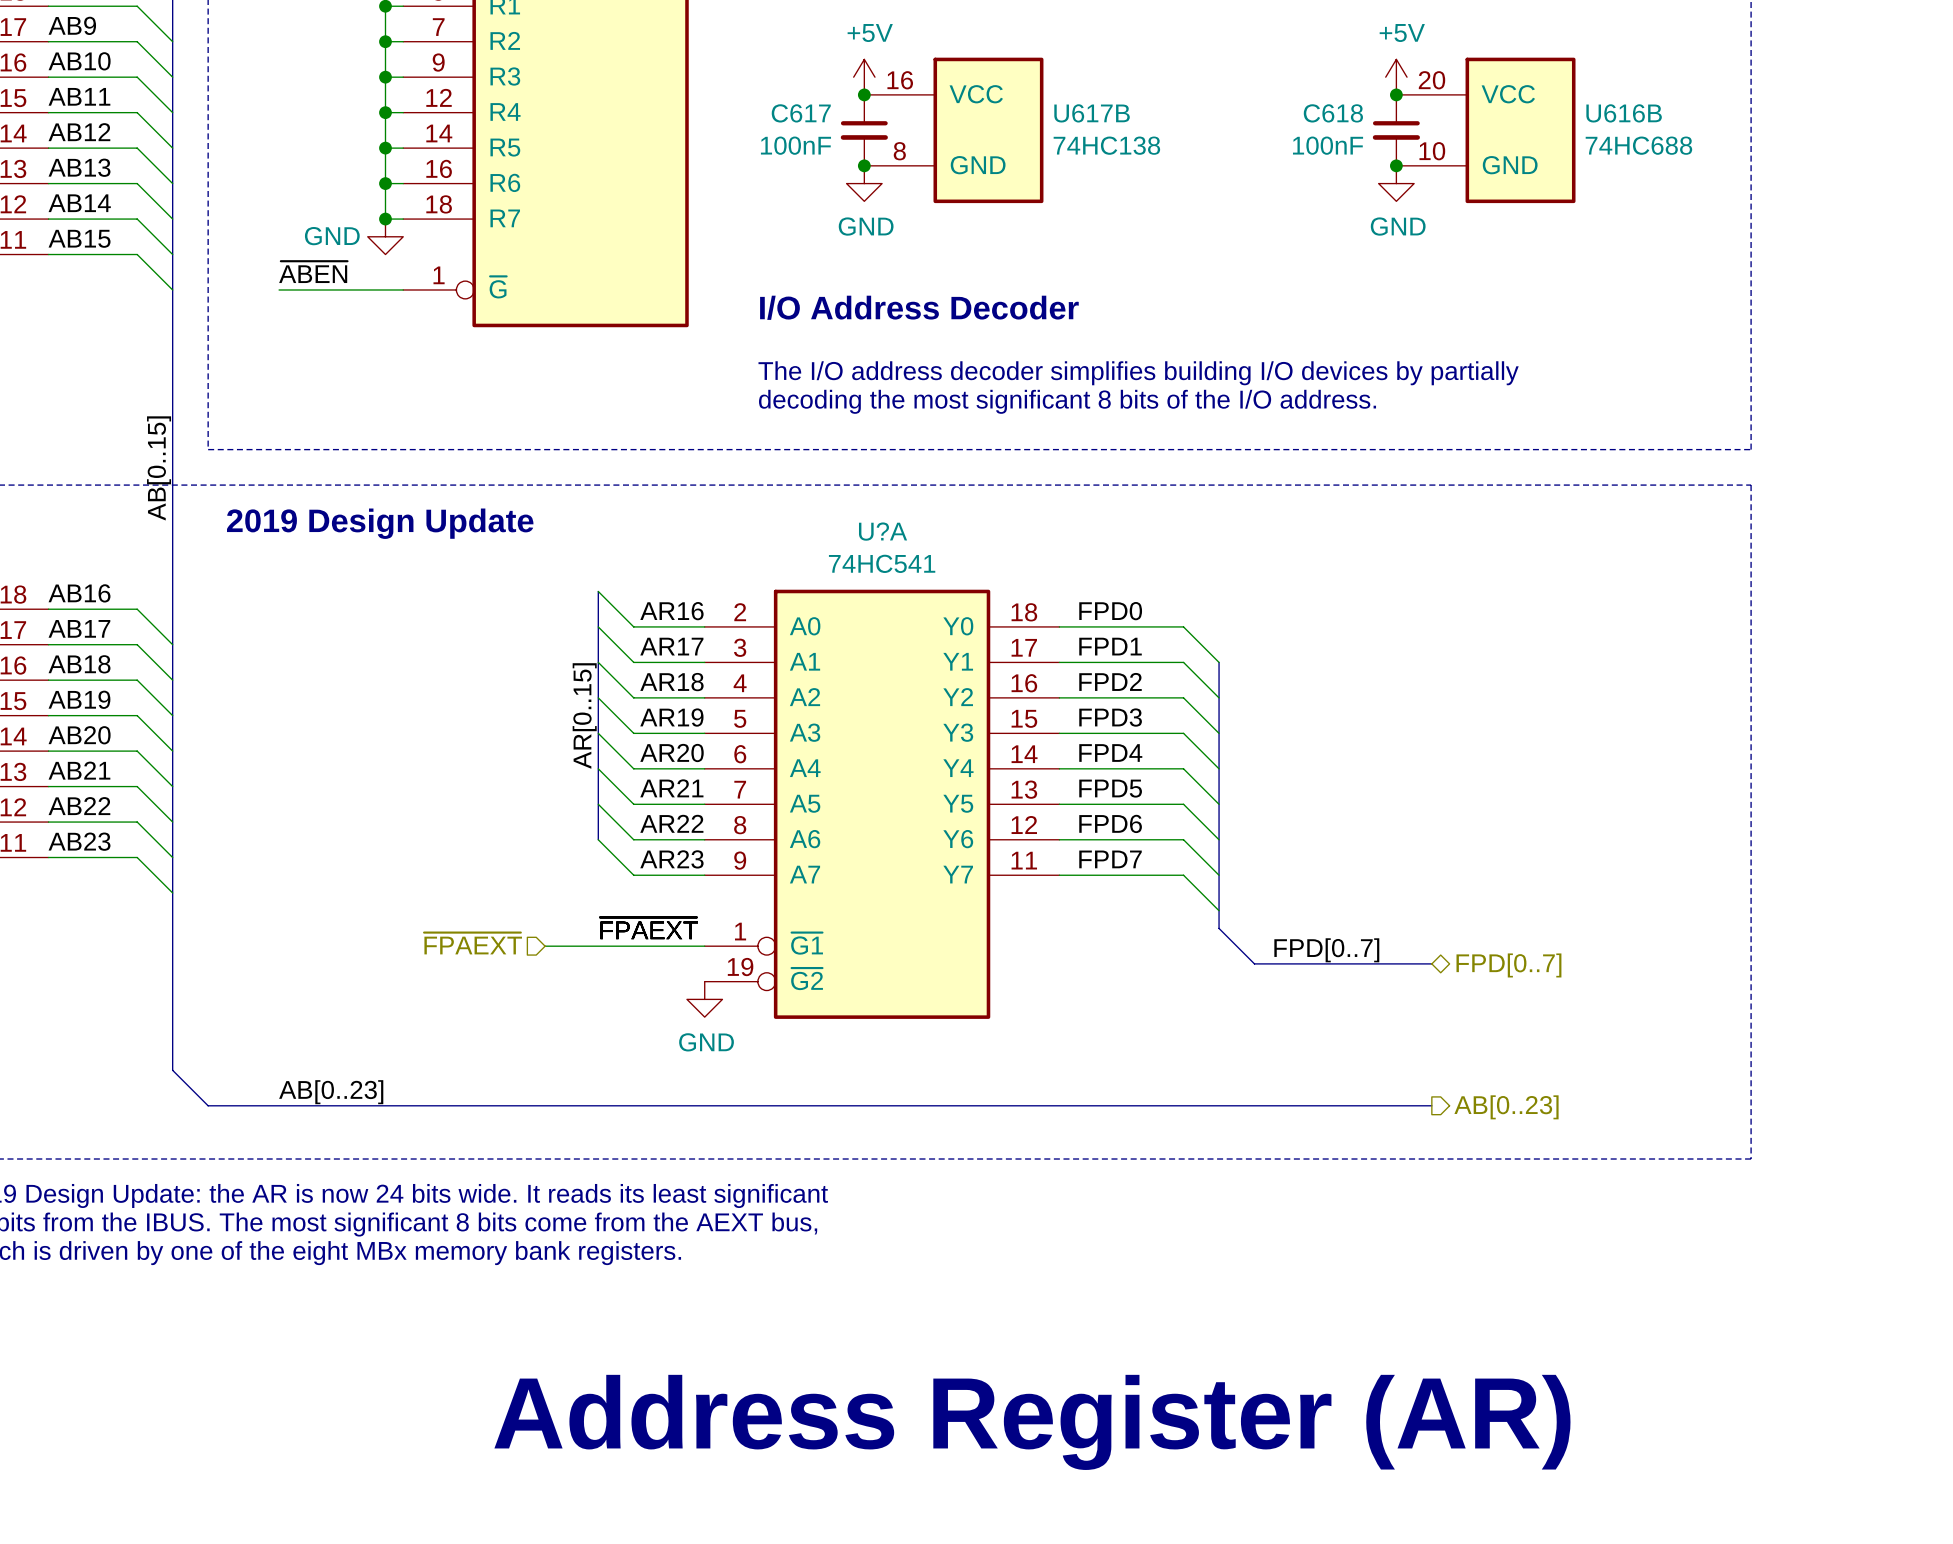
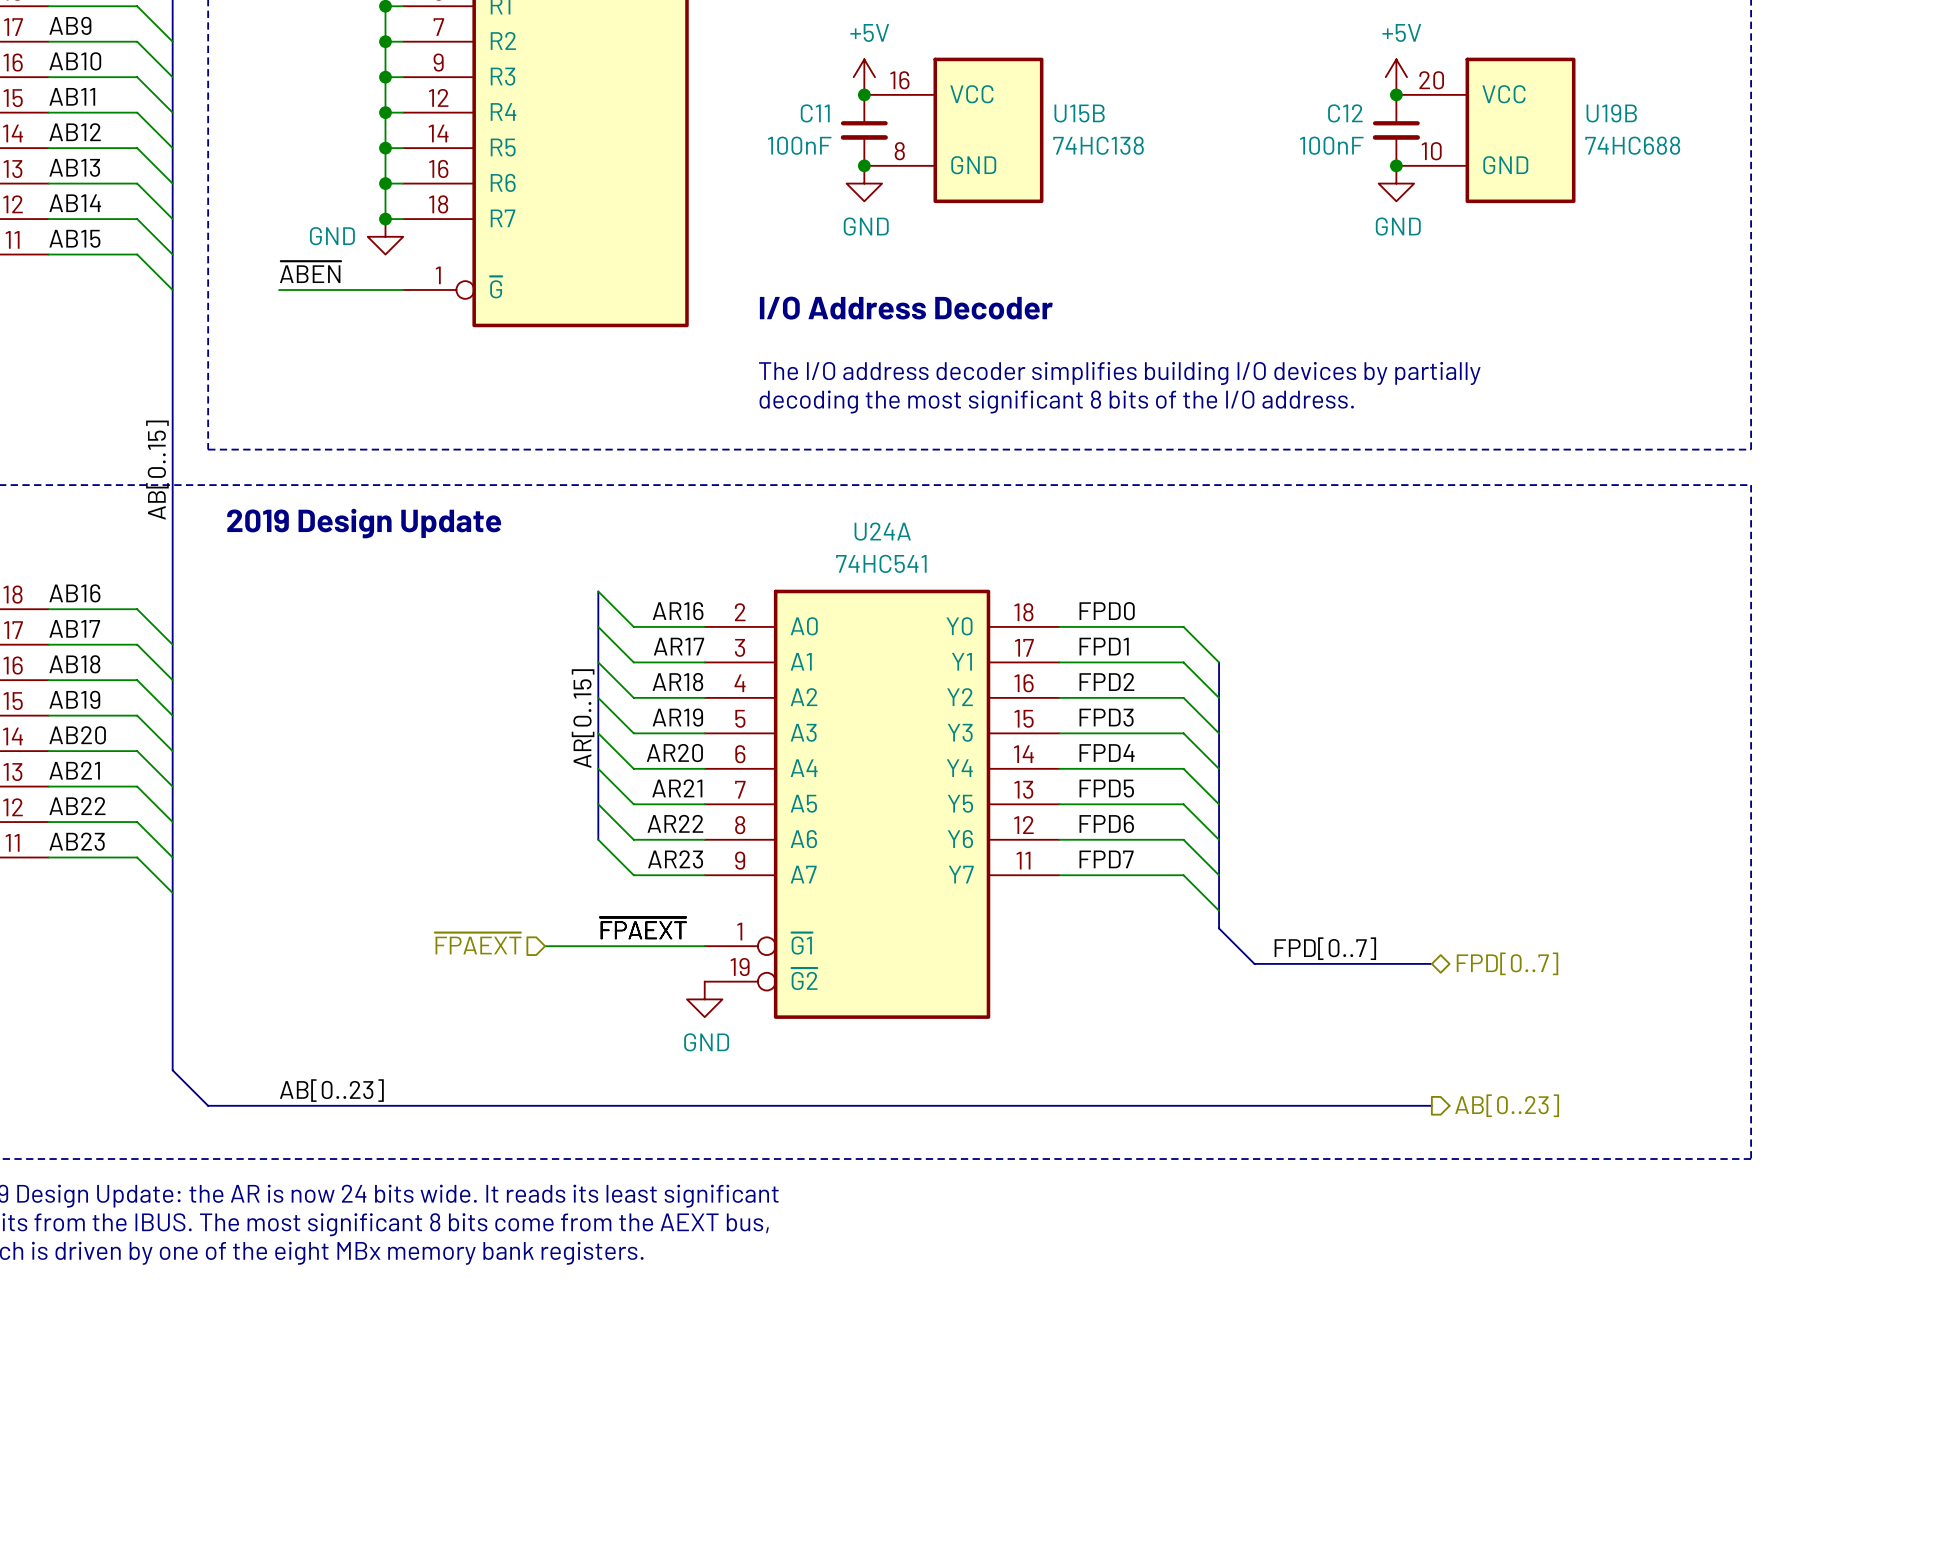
C617 name: C617 (801, 113) -> C11 (815, 113)
U617B name: U617B (1092, 113) -> U15B (1079, 113)
C618 name: C618 (1333, 113) -> C12 (1345, 113)
U616B name: U616B (1624, 113) -> U19B (1611, 113)
U?A name: U?A (883, 531) -> U24A (882, 531)
text: Address Register (AR) (1032, 1422) -> none

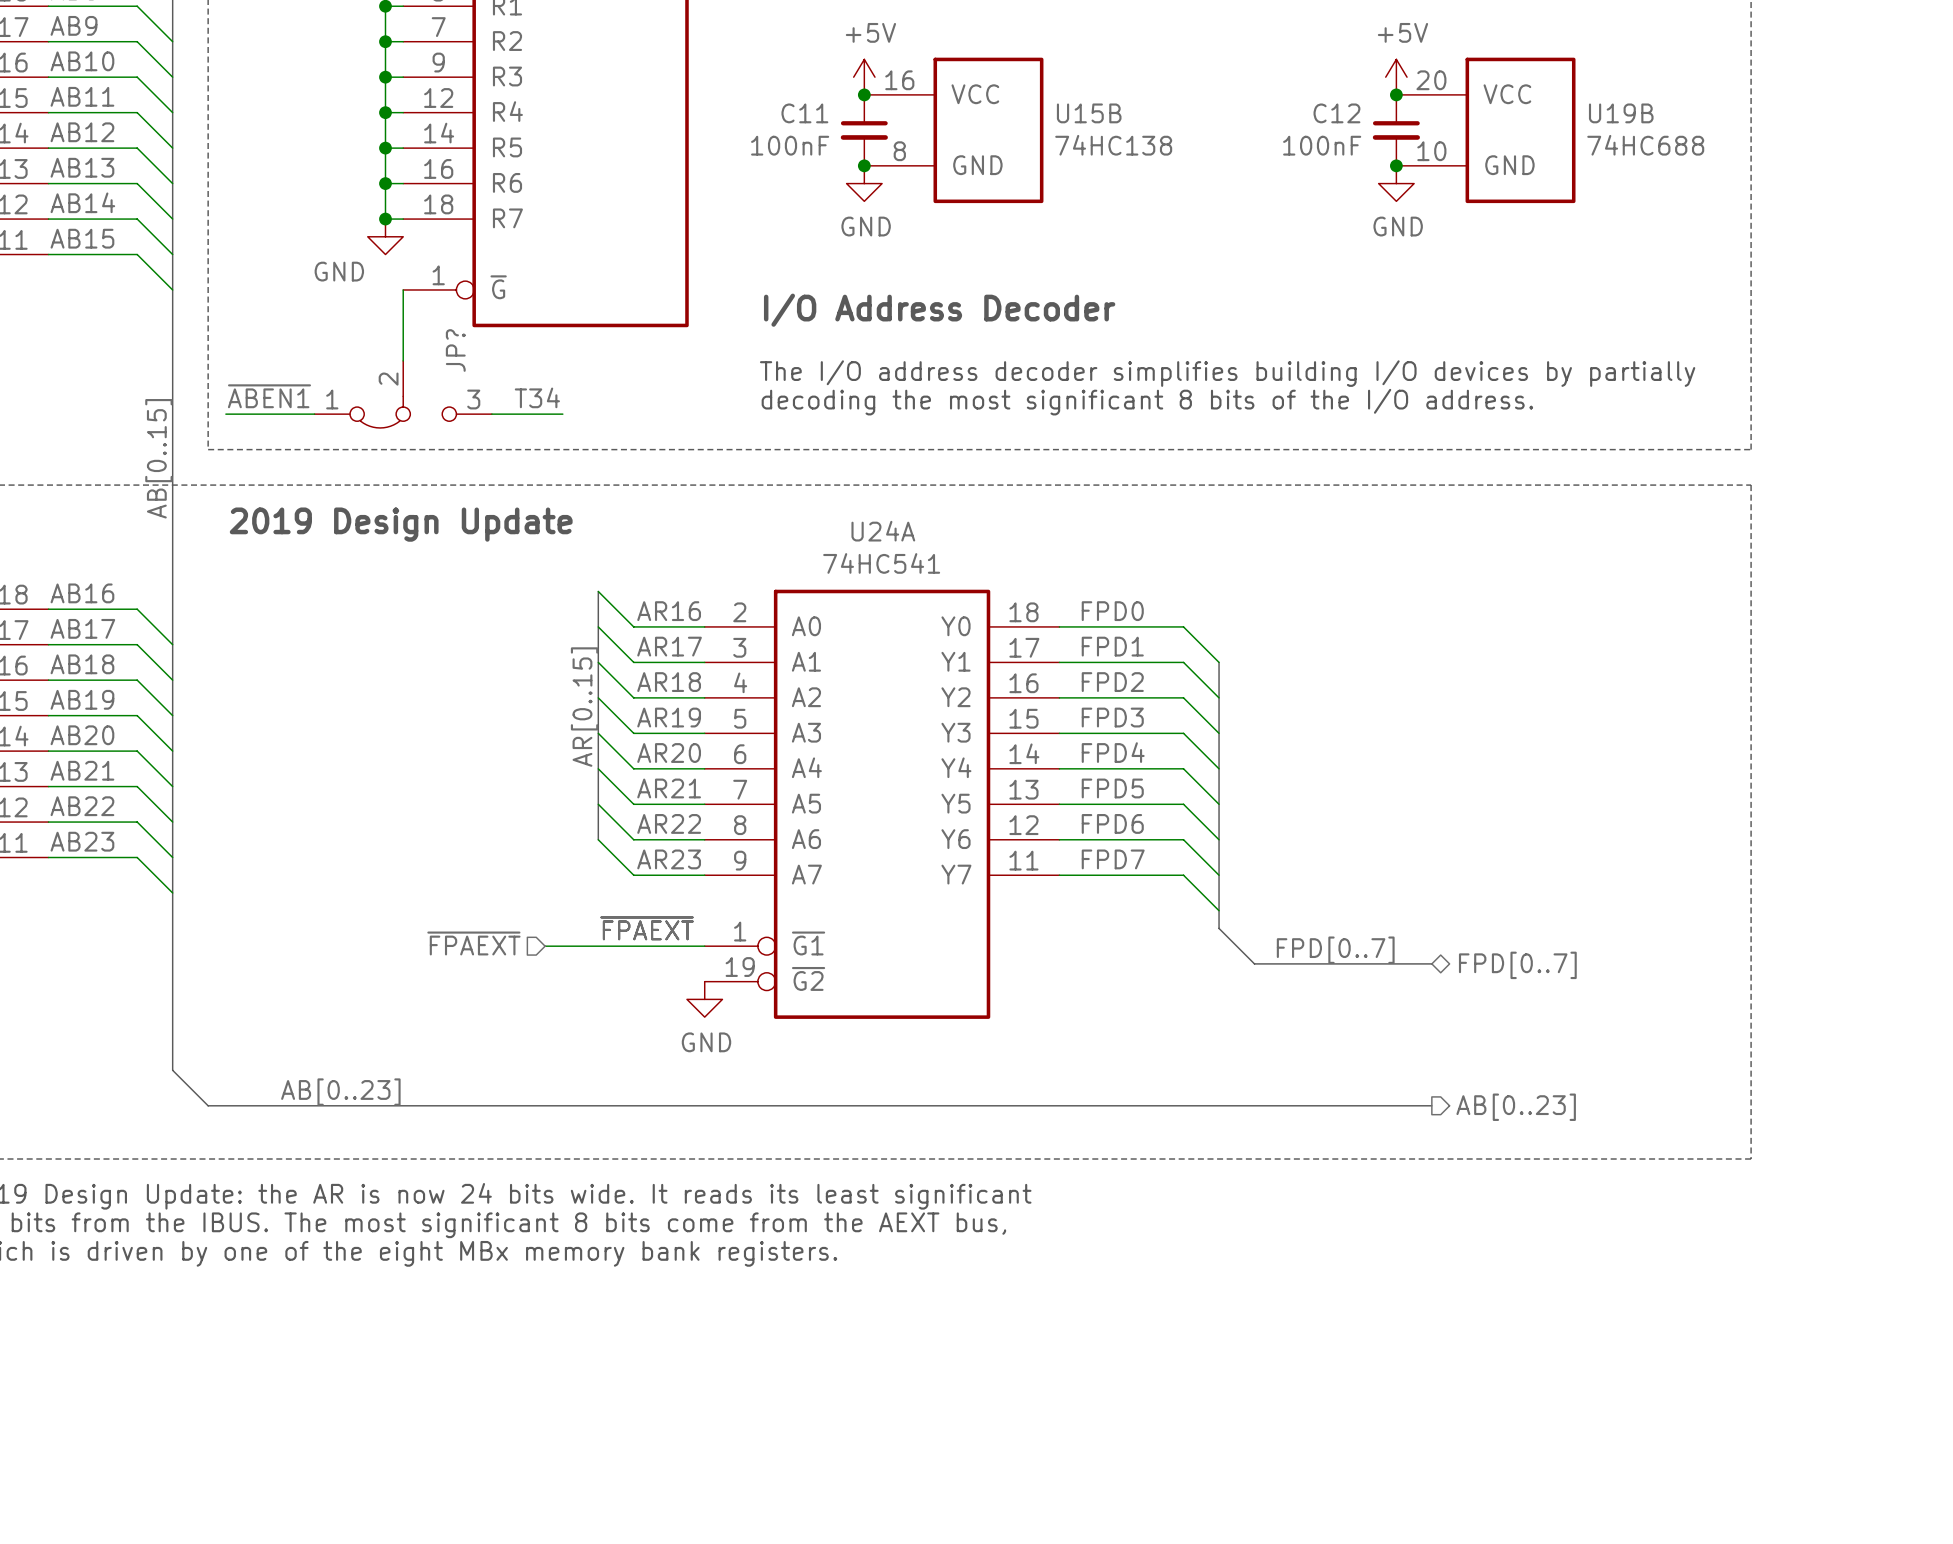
power symbol text position: GND (332, 236) -> GND (339, 271)
label: ~{ABEN} (310, 272) -> none
wire: (279, 289) (403, 289) -> (403, 360) (403, 289)
JP?: none -> (403, 394)
label: none -> ~{ABEN1} (269, 396)
label: none -> T34 (537, 397)
wire: none -> (225, 414) (314, 414)
wire: none -> (491, 414) (562, 414)

